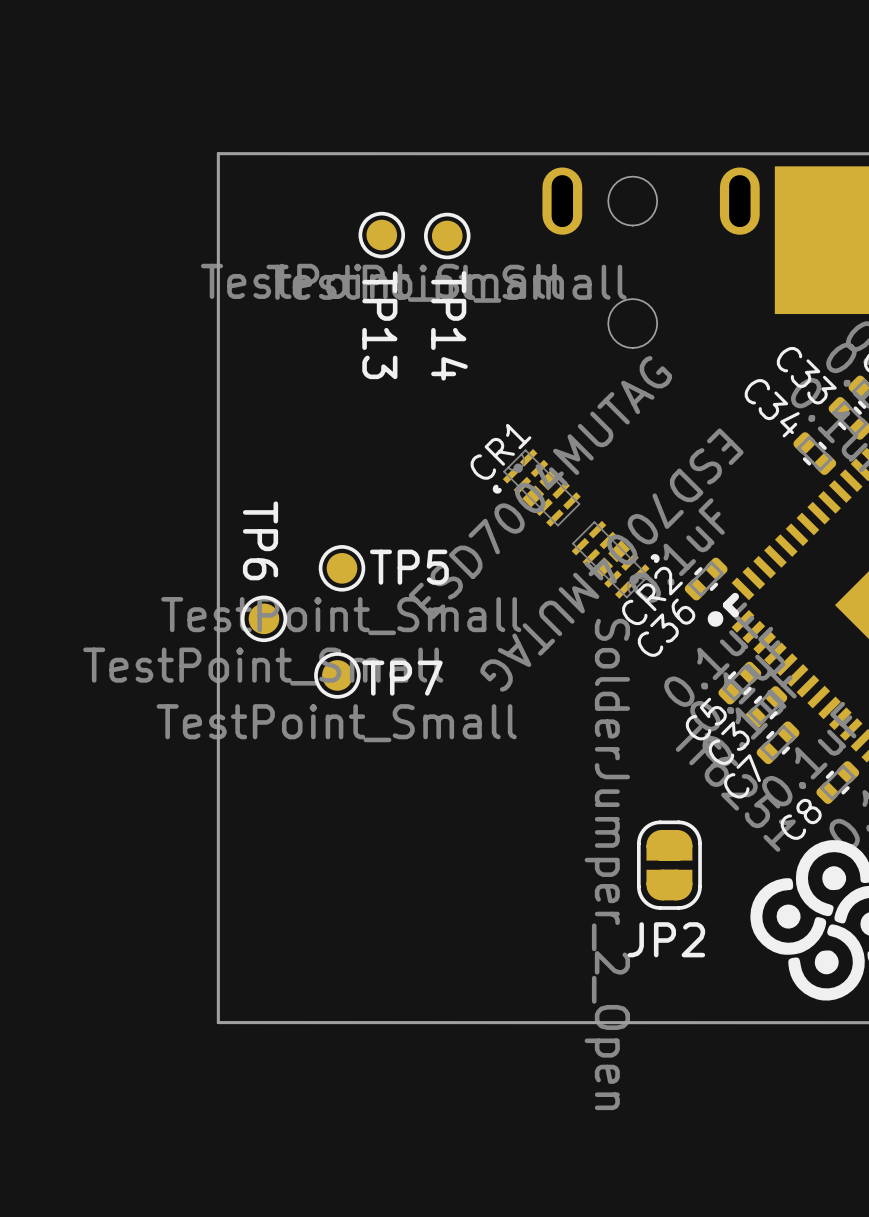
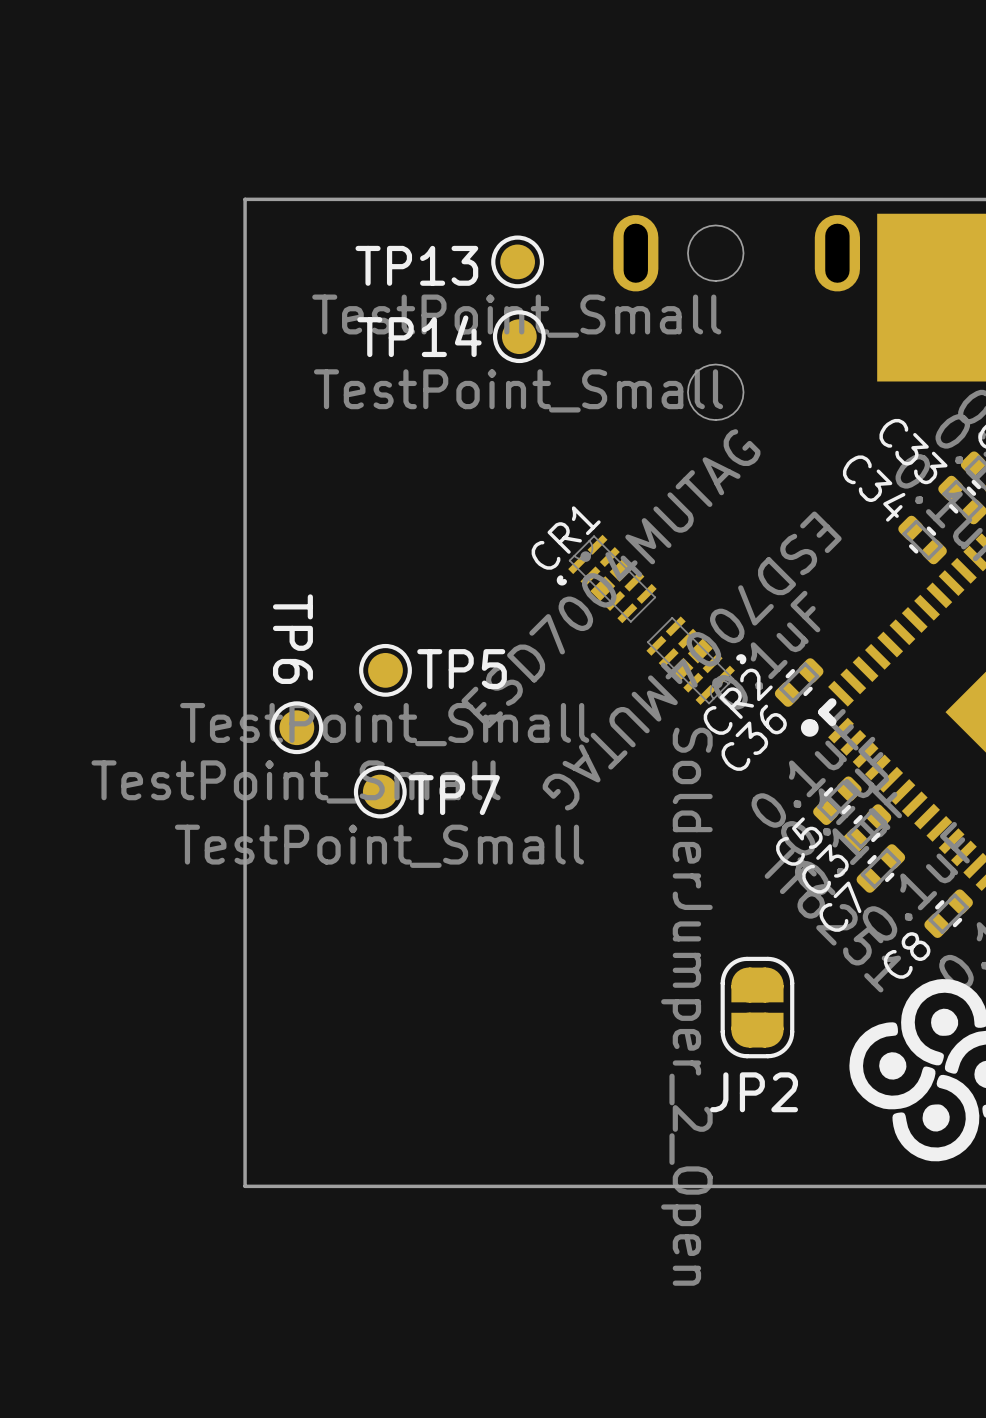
TP13 position: (381, 235) -> (517, 261)
TP14 position: (447, 235) -> (519, 336)
TP13 name rotation: 0° (379, 325) -> 90° counterclockwise (416, 265)
TP14 name rotation: 0° (449, 325) -> 90° counterclockwise (419, 336)

